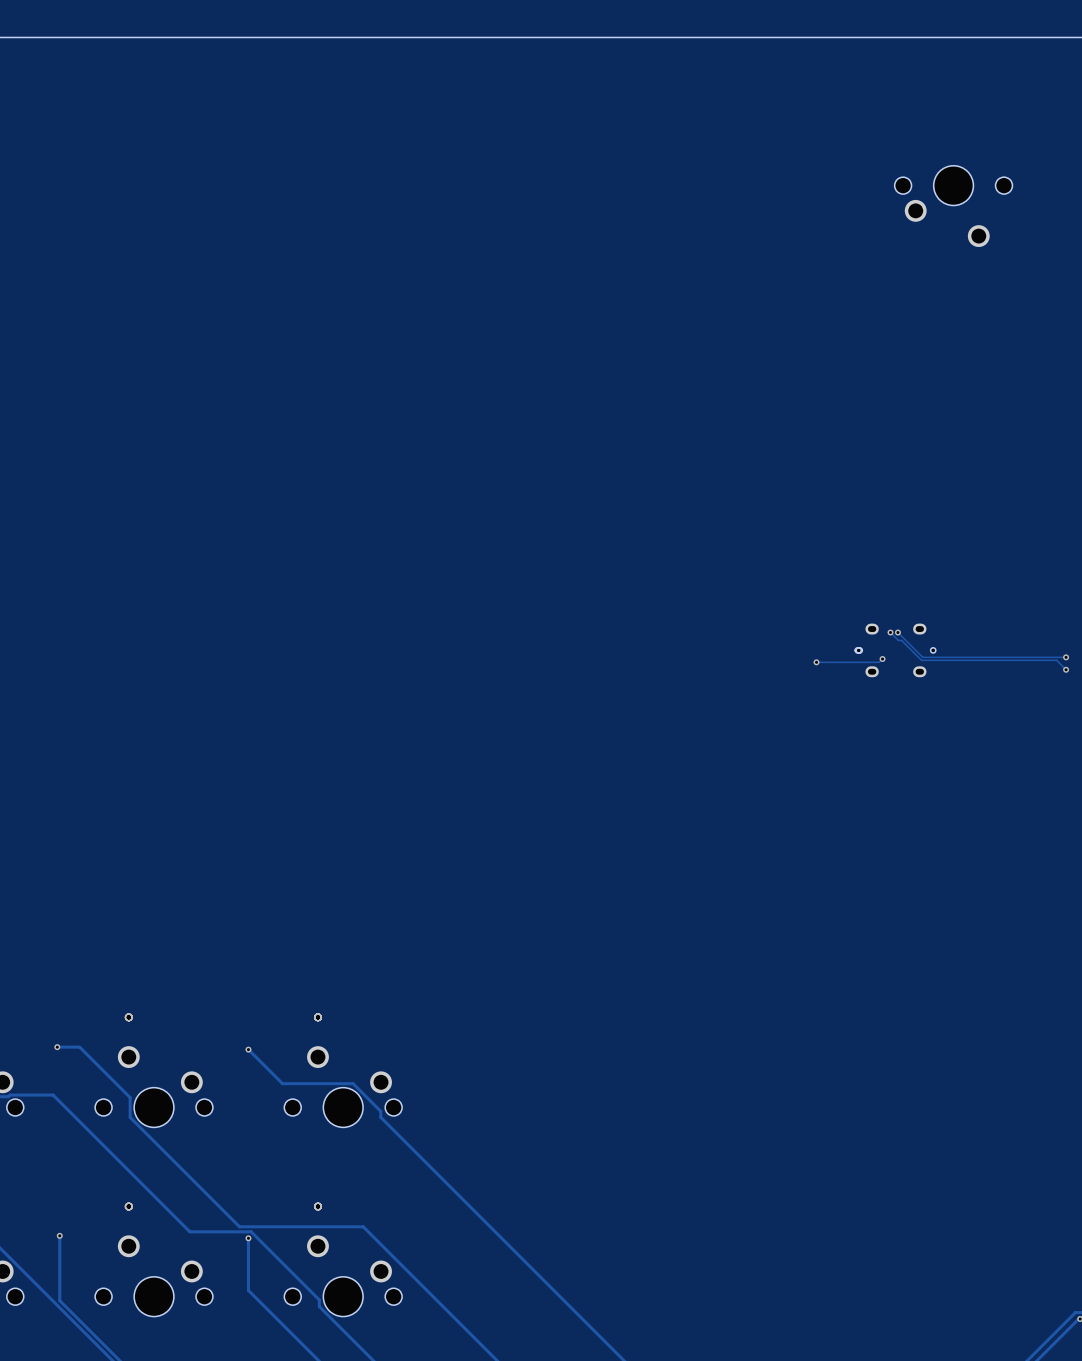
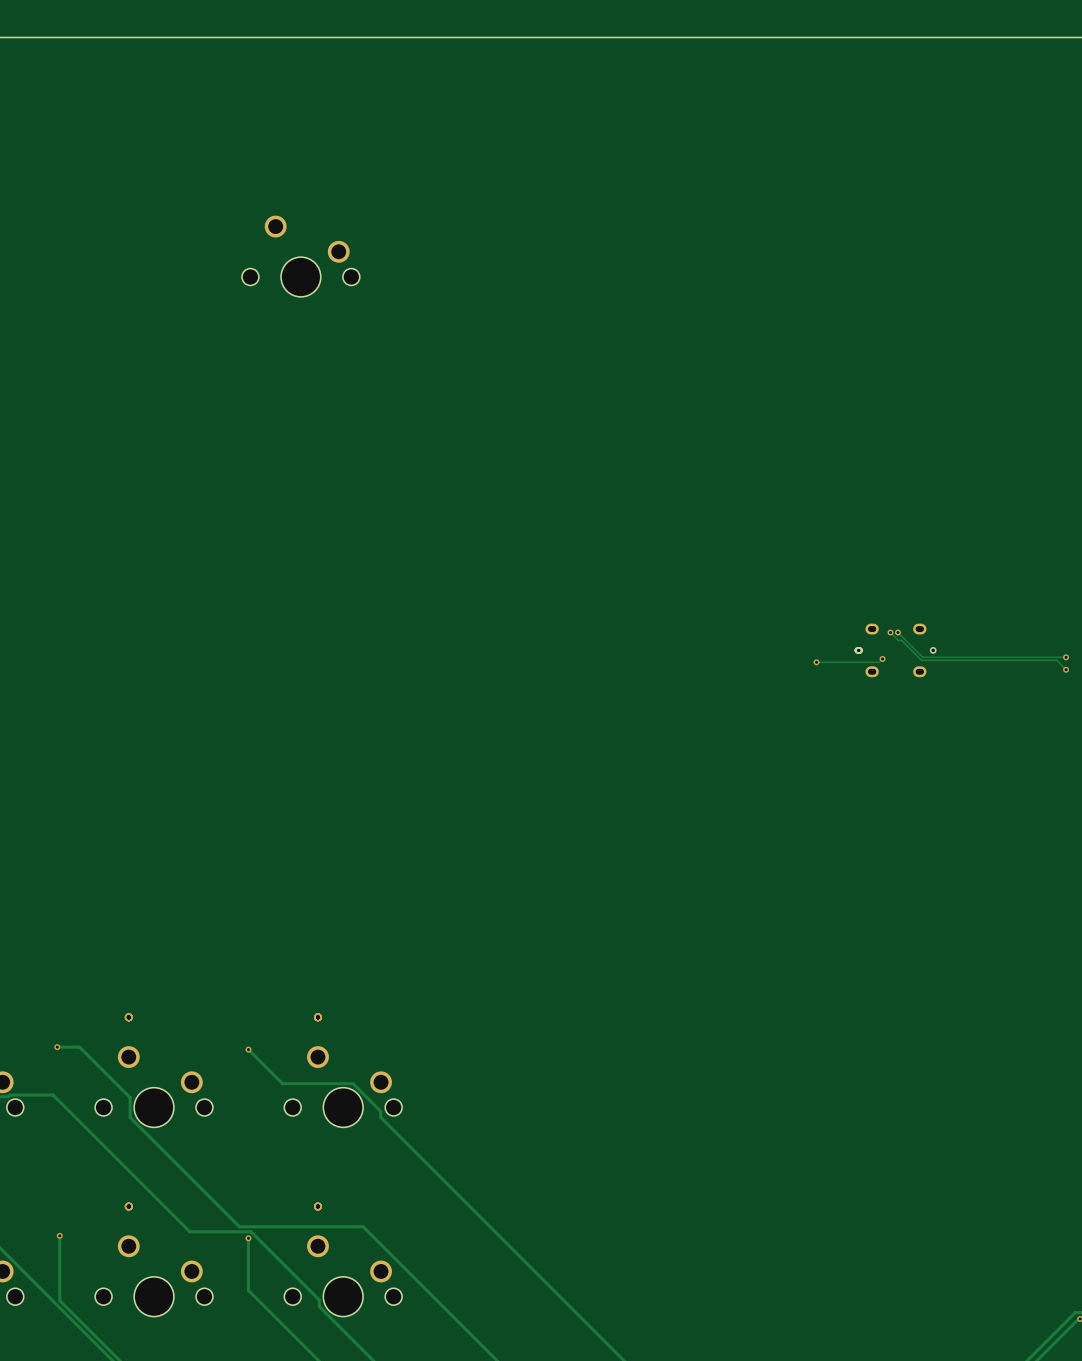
part: (953, 206) -> none
part: none -> (300, 256)

